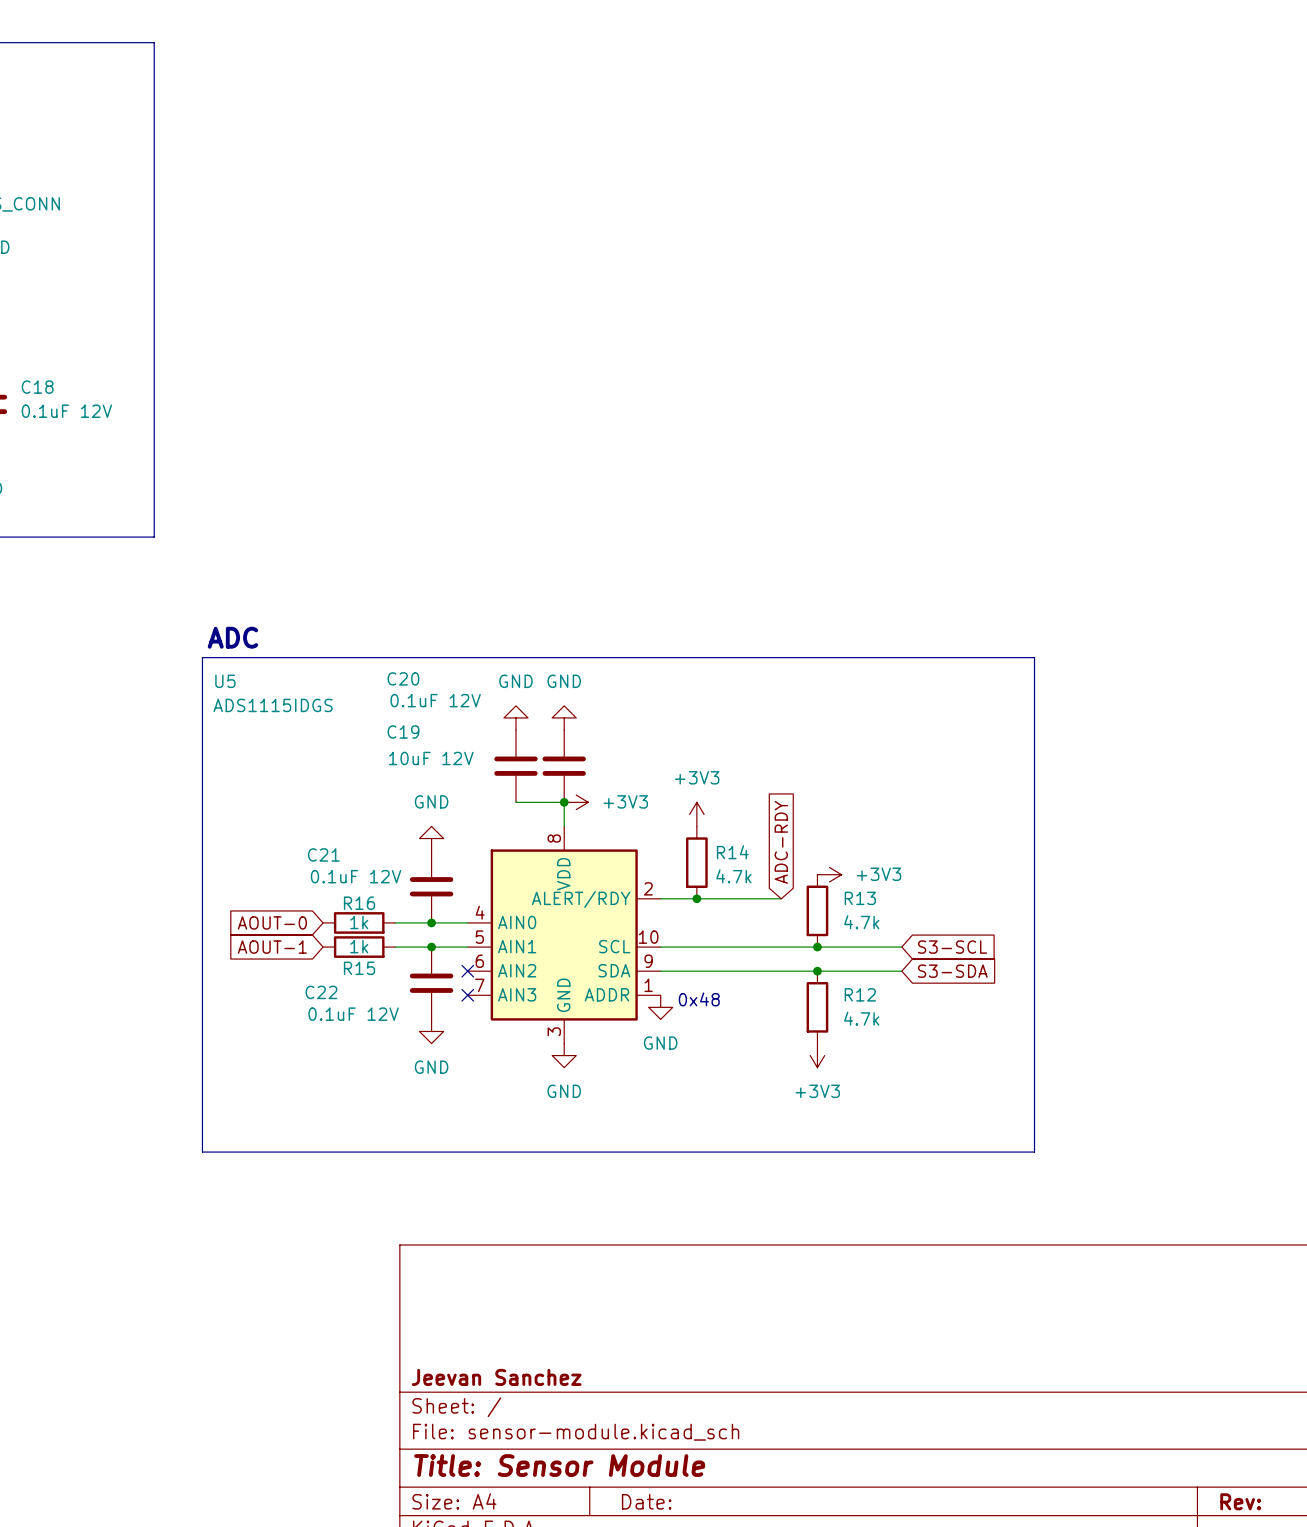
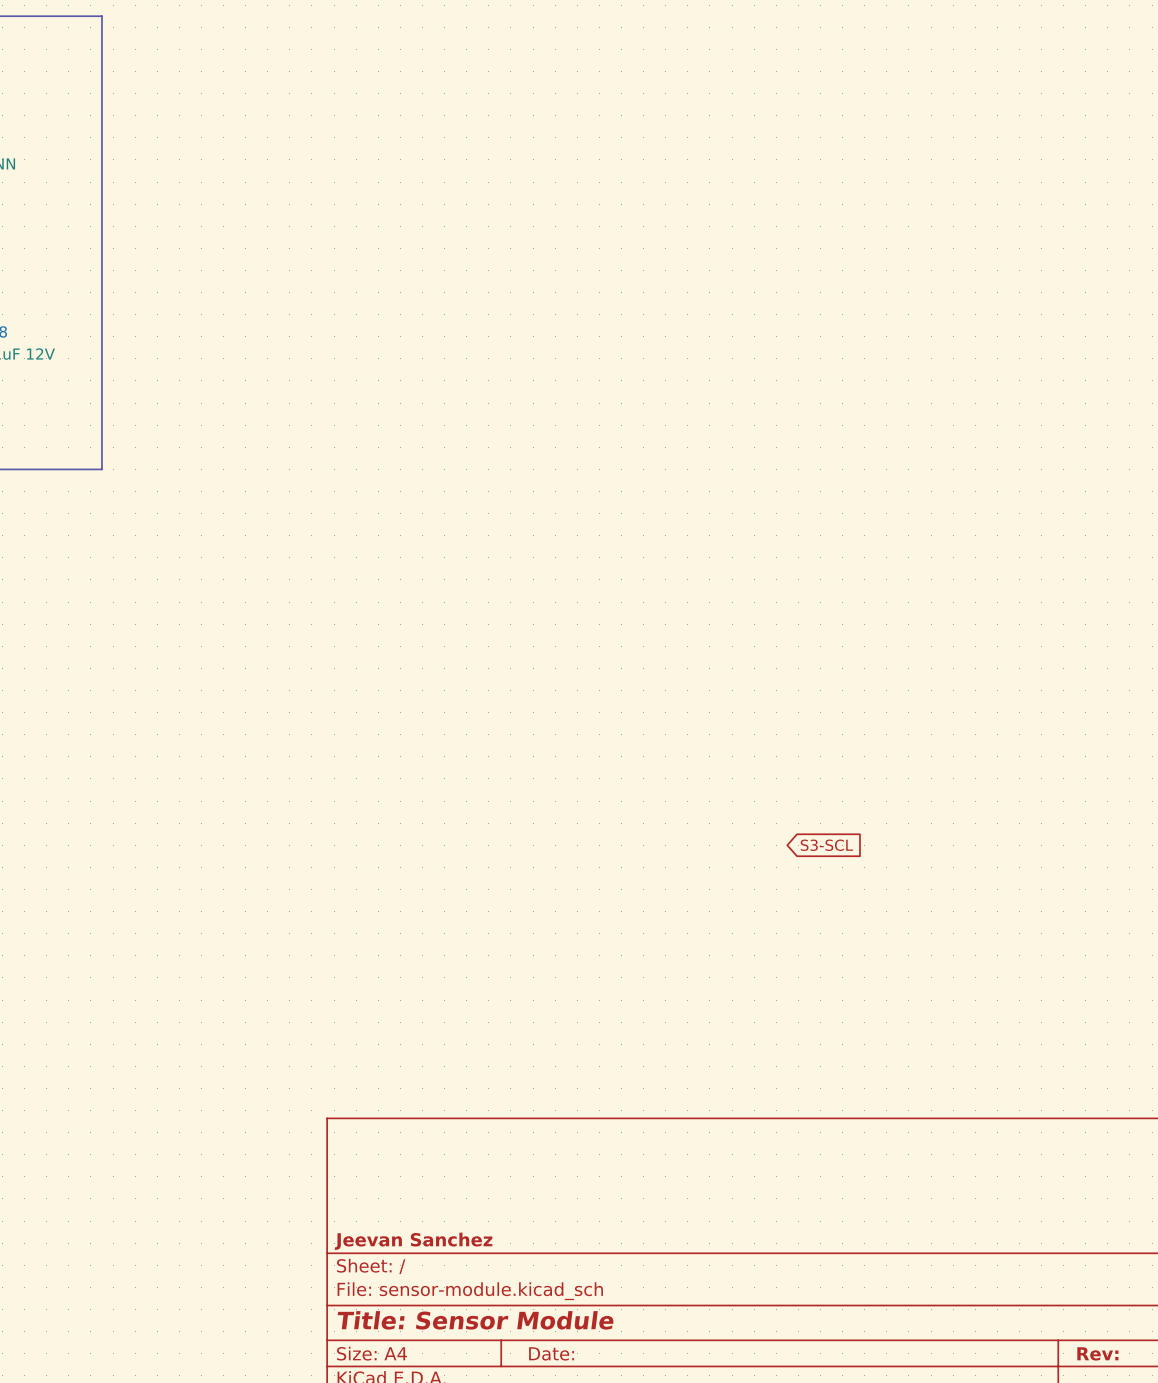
text: ADC (232, 637) -> none
line: (202, 657) (1034, 657) (1034, 1152) (202, 1152) (202, 657) -> none
power symbol: GND (515, 717) -> none
power symbol: GND (564, 717) -> none
C20: 0.1uF 12V (515, 766) -> none
C19: 10uF 12V (564, 766) -> none
wire: (515, 802) (564, 802) (564, 826) -> none
junction: (564, 802) -> none
power symbol: +3V3 (576, 802) -> none
power symbol: +3V3 (696, 814) -> none
power symbol: GND (431, 838) -> none
global label: ADC-RDY (781, 842) -> none
R14: 4.7k (696, 862) -> none
power symbol: +3V3 (829, 874) -> none
C21: 0.1uF 12V (431, 886) -> none
wire: (660, 898) (781, 898) -> none
junction: (696, 898) -> none
R13: 4.7k (817, 910) -> none
global label: AOUT-0 (272, 922) -> none
R16: 1k (359, 922) -> none
wire: (395, 922) (467, 922) -> none
junction: (431, 922) -> none
U5: ADS1115IDGS (564, 935) -> none
global label: AOUT-1 (272, 947) -> none
R15: 1k (359, 947) -> none
wire: (395, 947) (467, 947) -> none
junction: (431, 947) -> none
wire: (660, 947) (901, 947) -> none
junction: (817, 947) -> none
no-connect mark: (467, 971) -> none
wire: (660, 971) (901, 971) -> none
junction: (817, 971) -> none
global label: S3-SDA (952, 971) -> none
C22: 0.1uF 12V (431, 983) -> none
no-connect mark: (467, 995) -> none
text: 0x48 (699, 999) -> none
power symbol: GND (660, 1007) -> none
R12: 4.7k (817, 1007) -> none
power symbol: GND (431, 1031) -> none
power symbol: GND (564, 1055) -> none
power symbol: +3V3 (817, 1055) -> none

